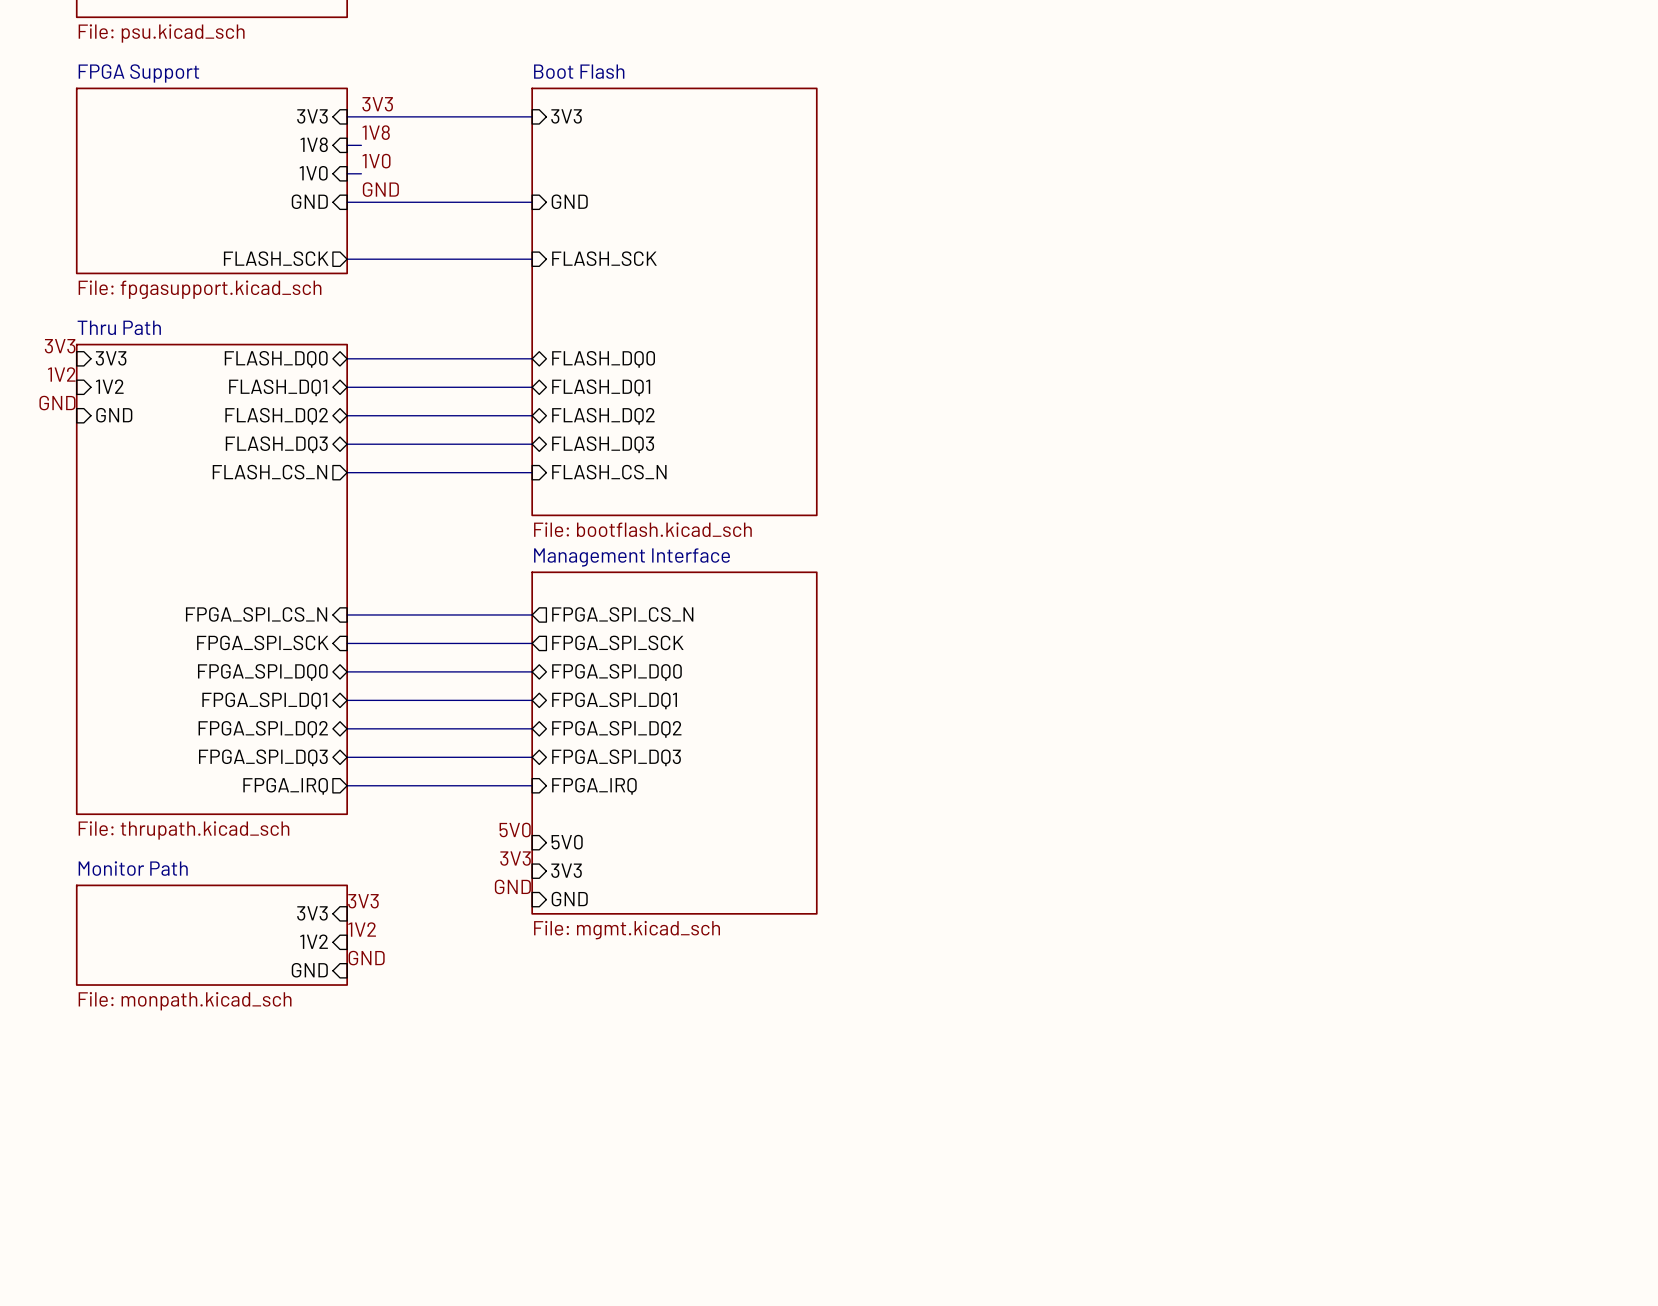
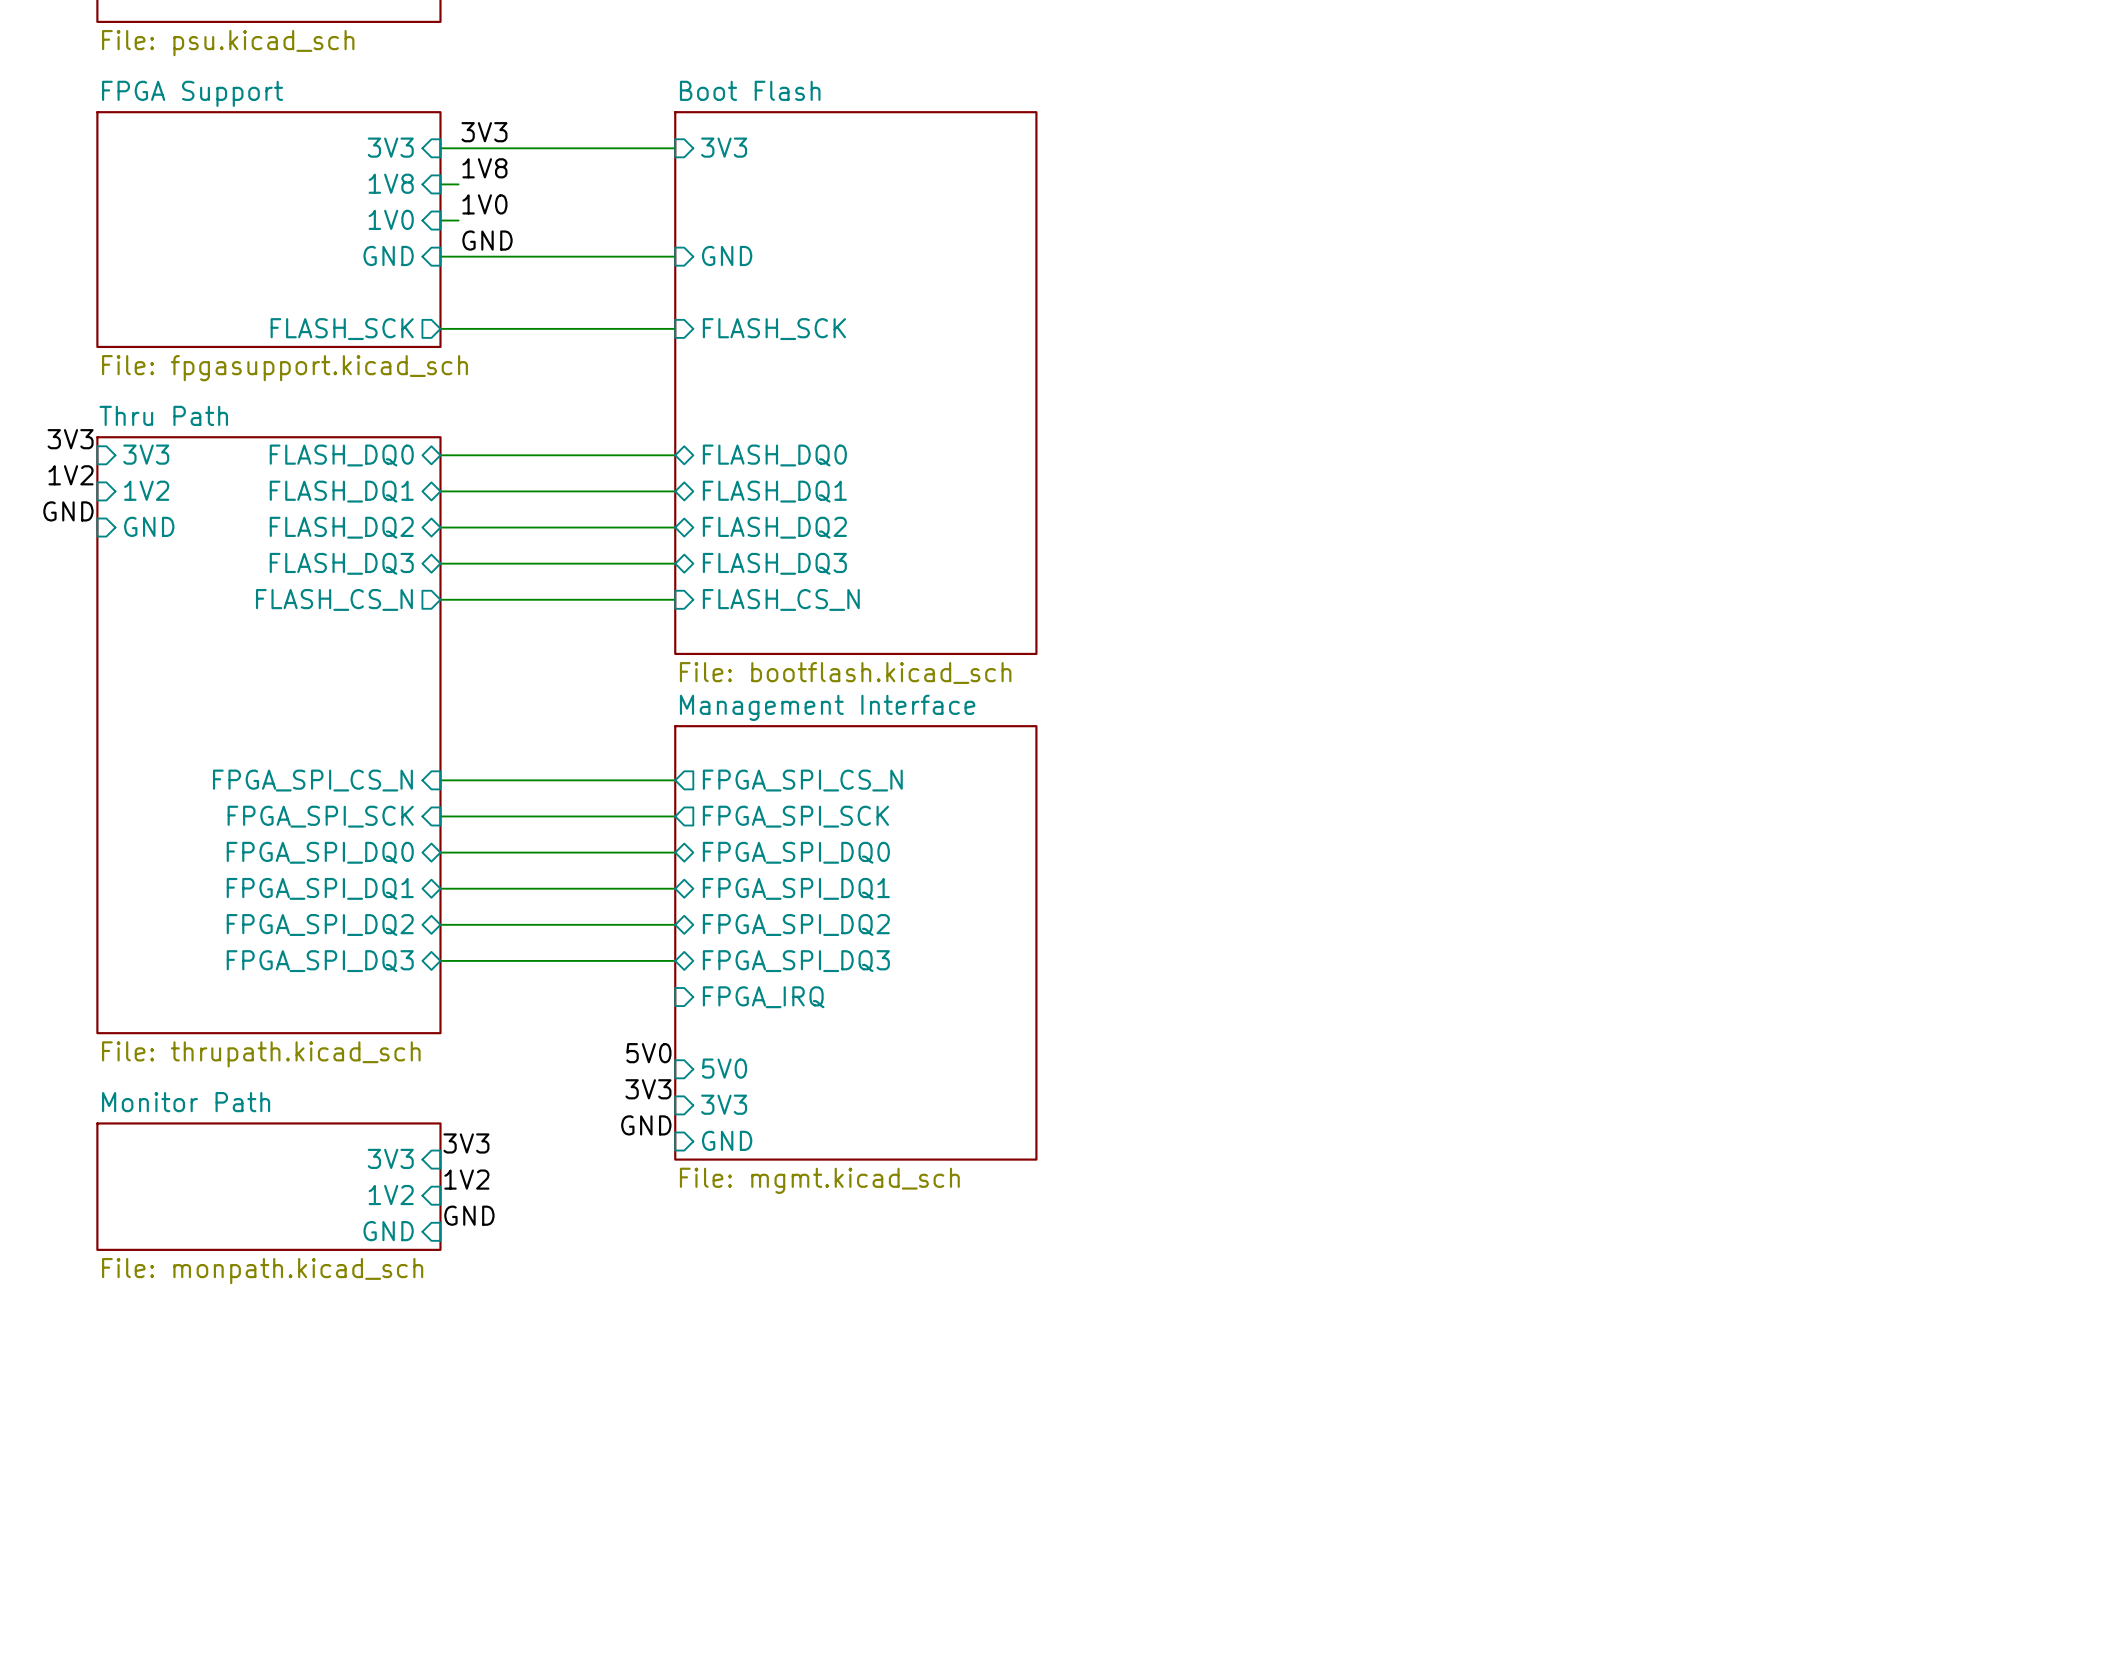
wire: (347, 785) (532, 785) -> none
sheet pin: FPGA_IRQ (285, 786) -> none

